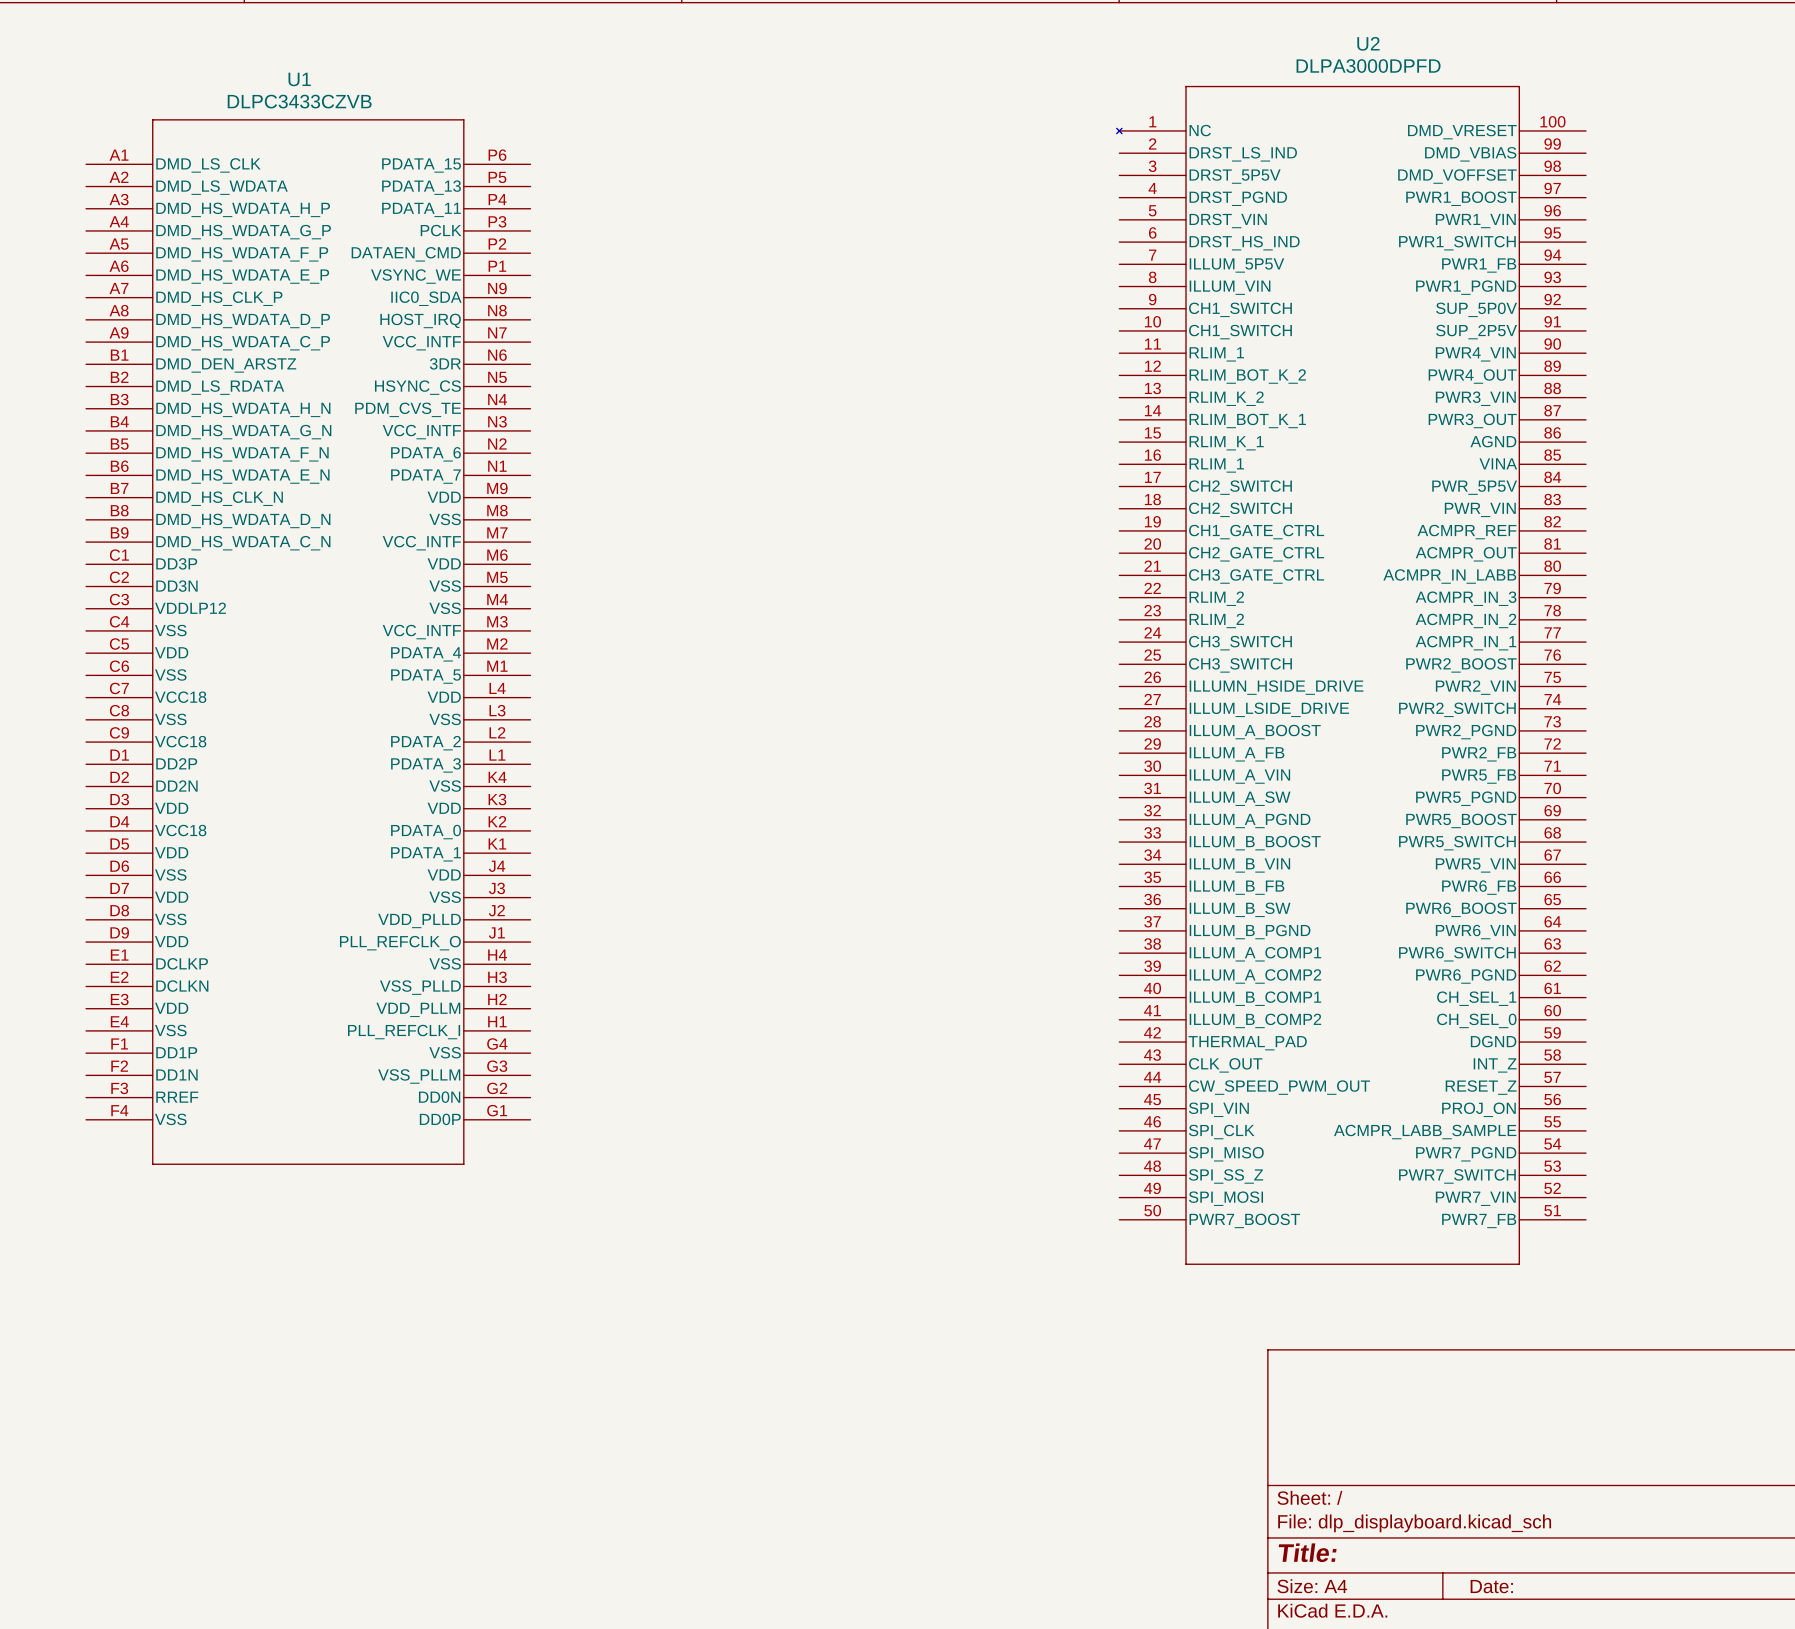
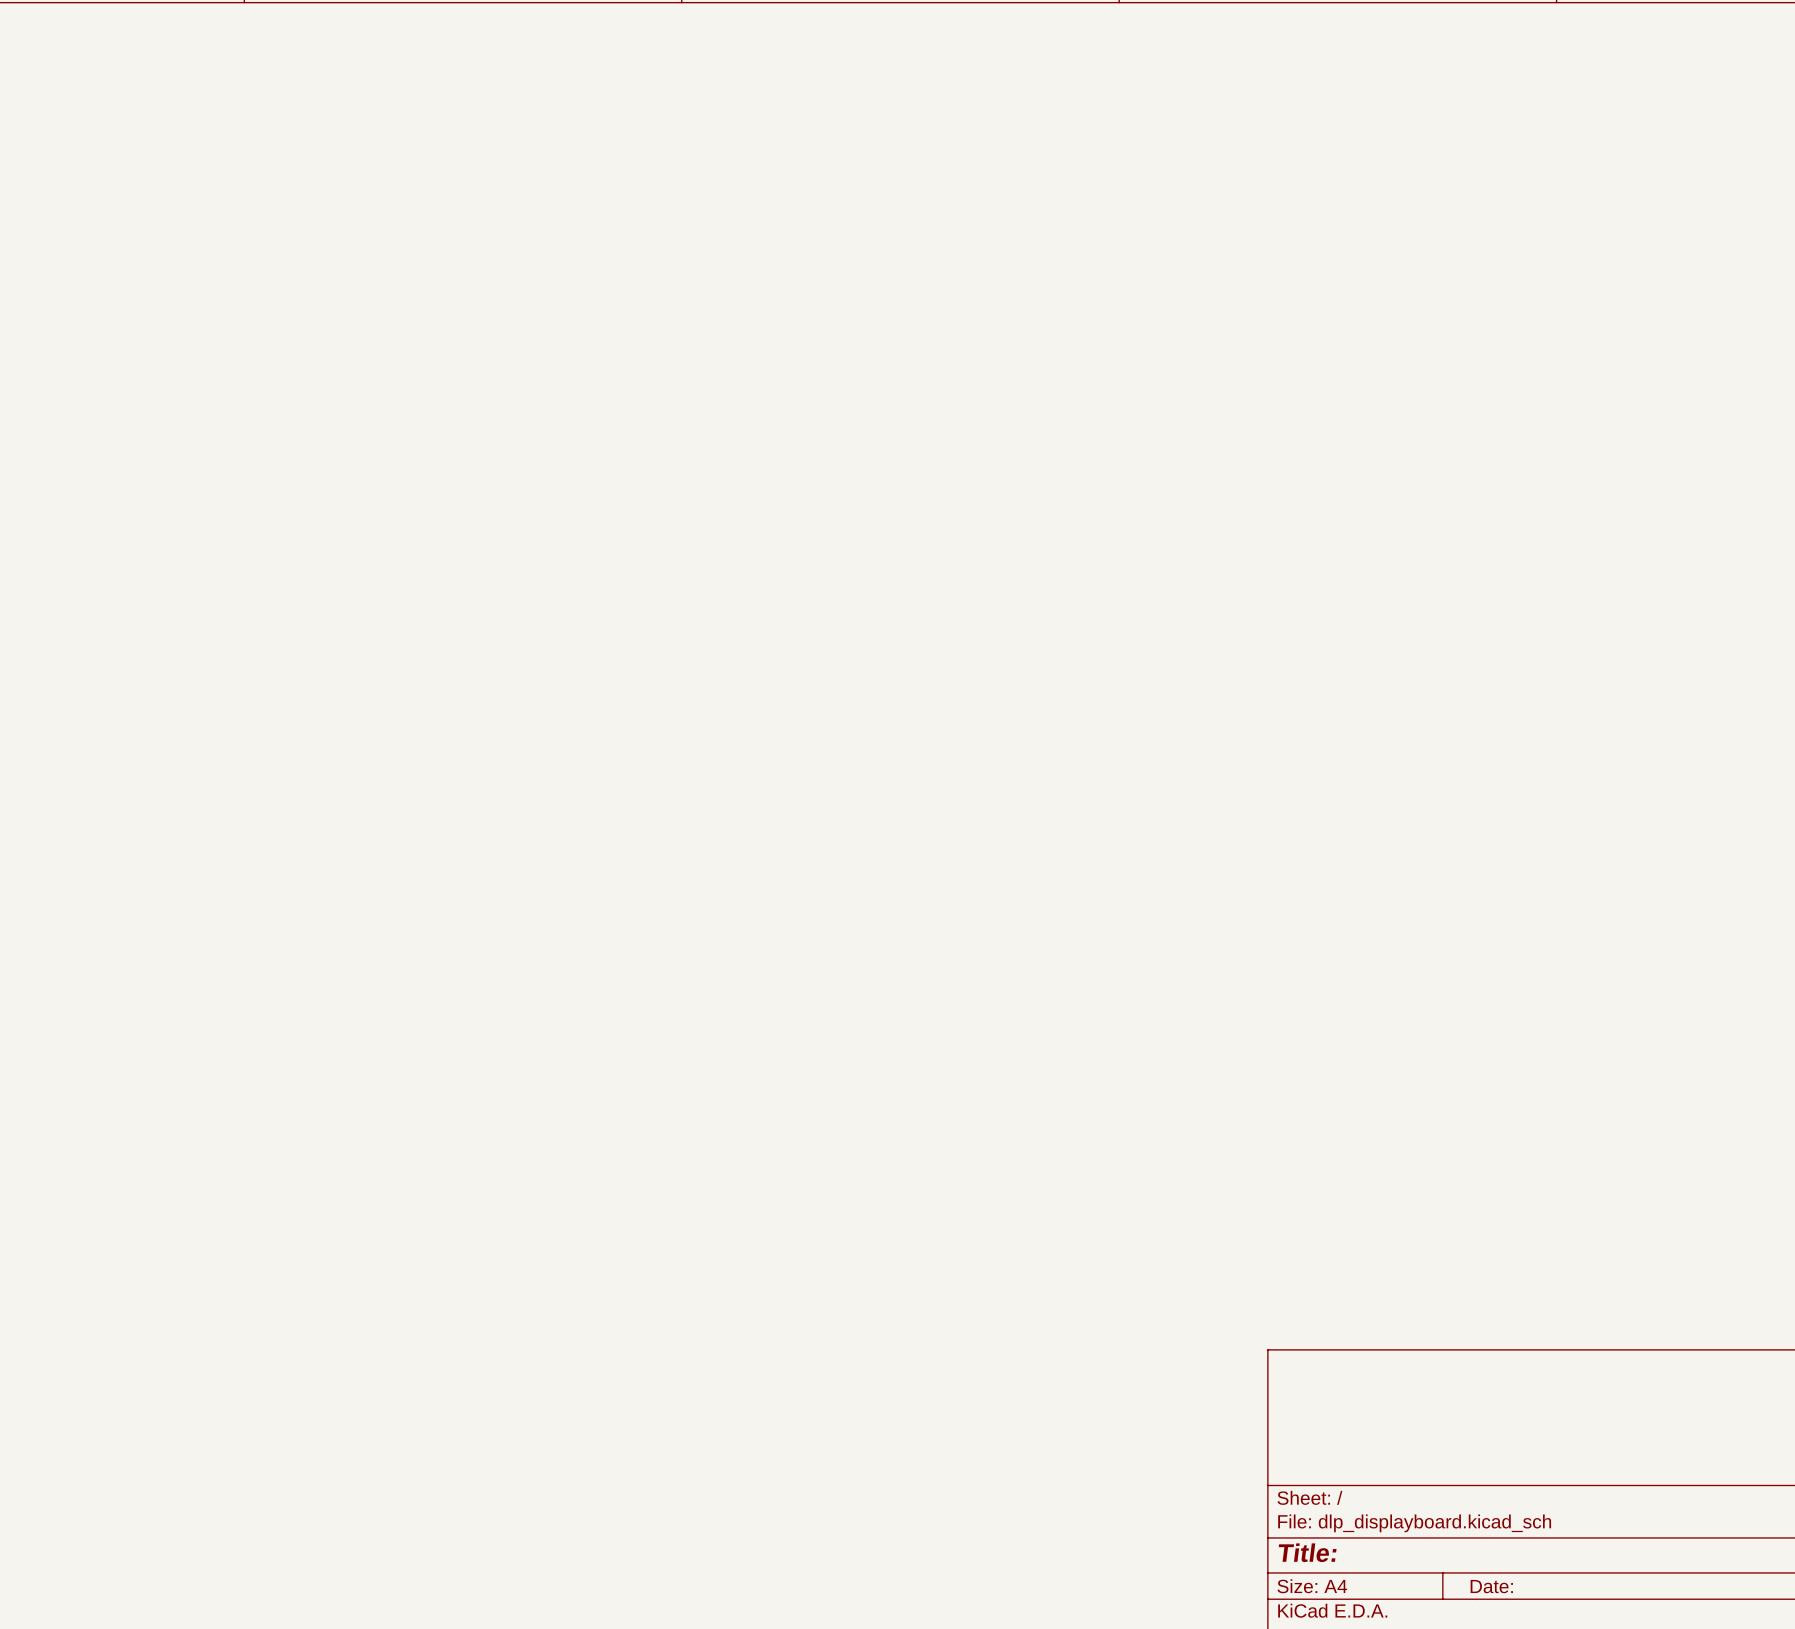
U1: DLPC3433CZVB (308, 642) -> none
U2: DLPA3000DPFD (1351, 675) -> none

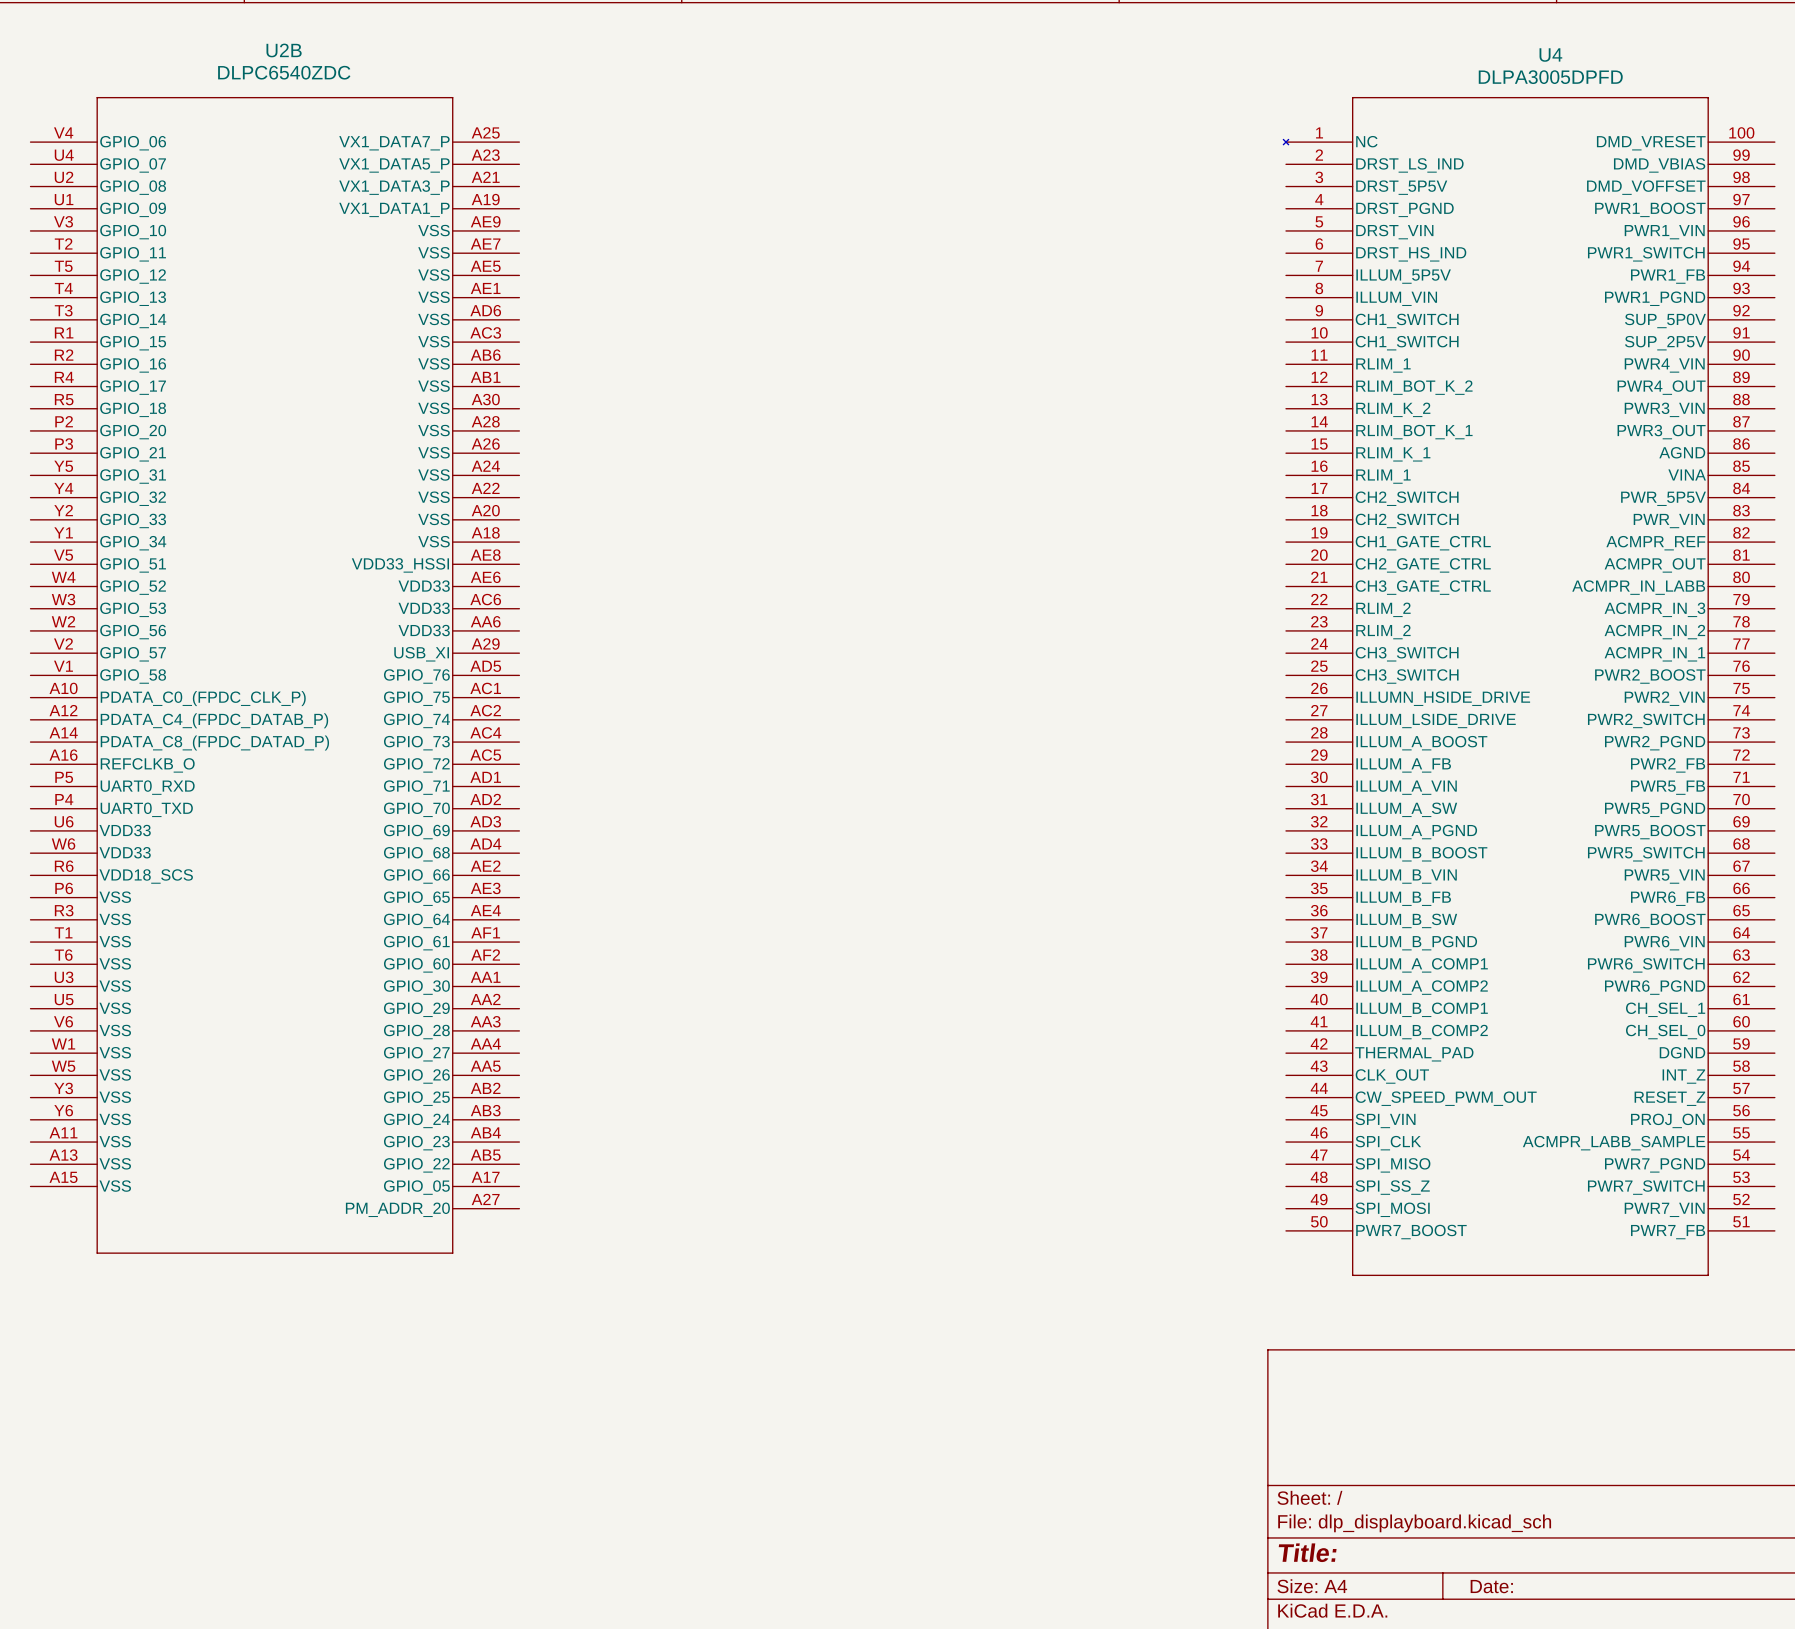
U2B: none -> DLPC6540ZDC (274, 675)
U4: none -> DLPA3005DPFD (1529, 686)

